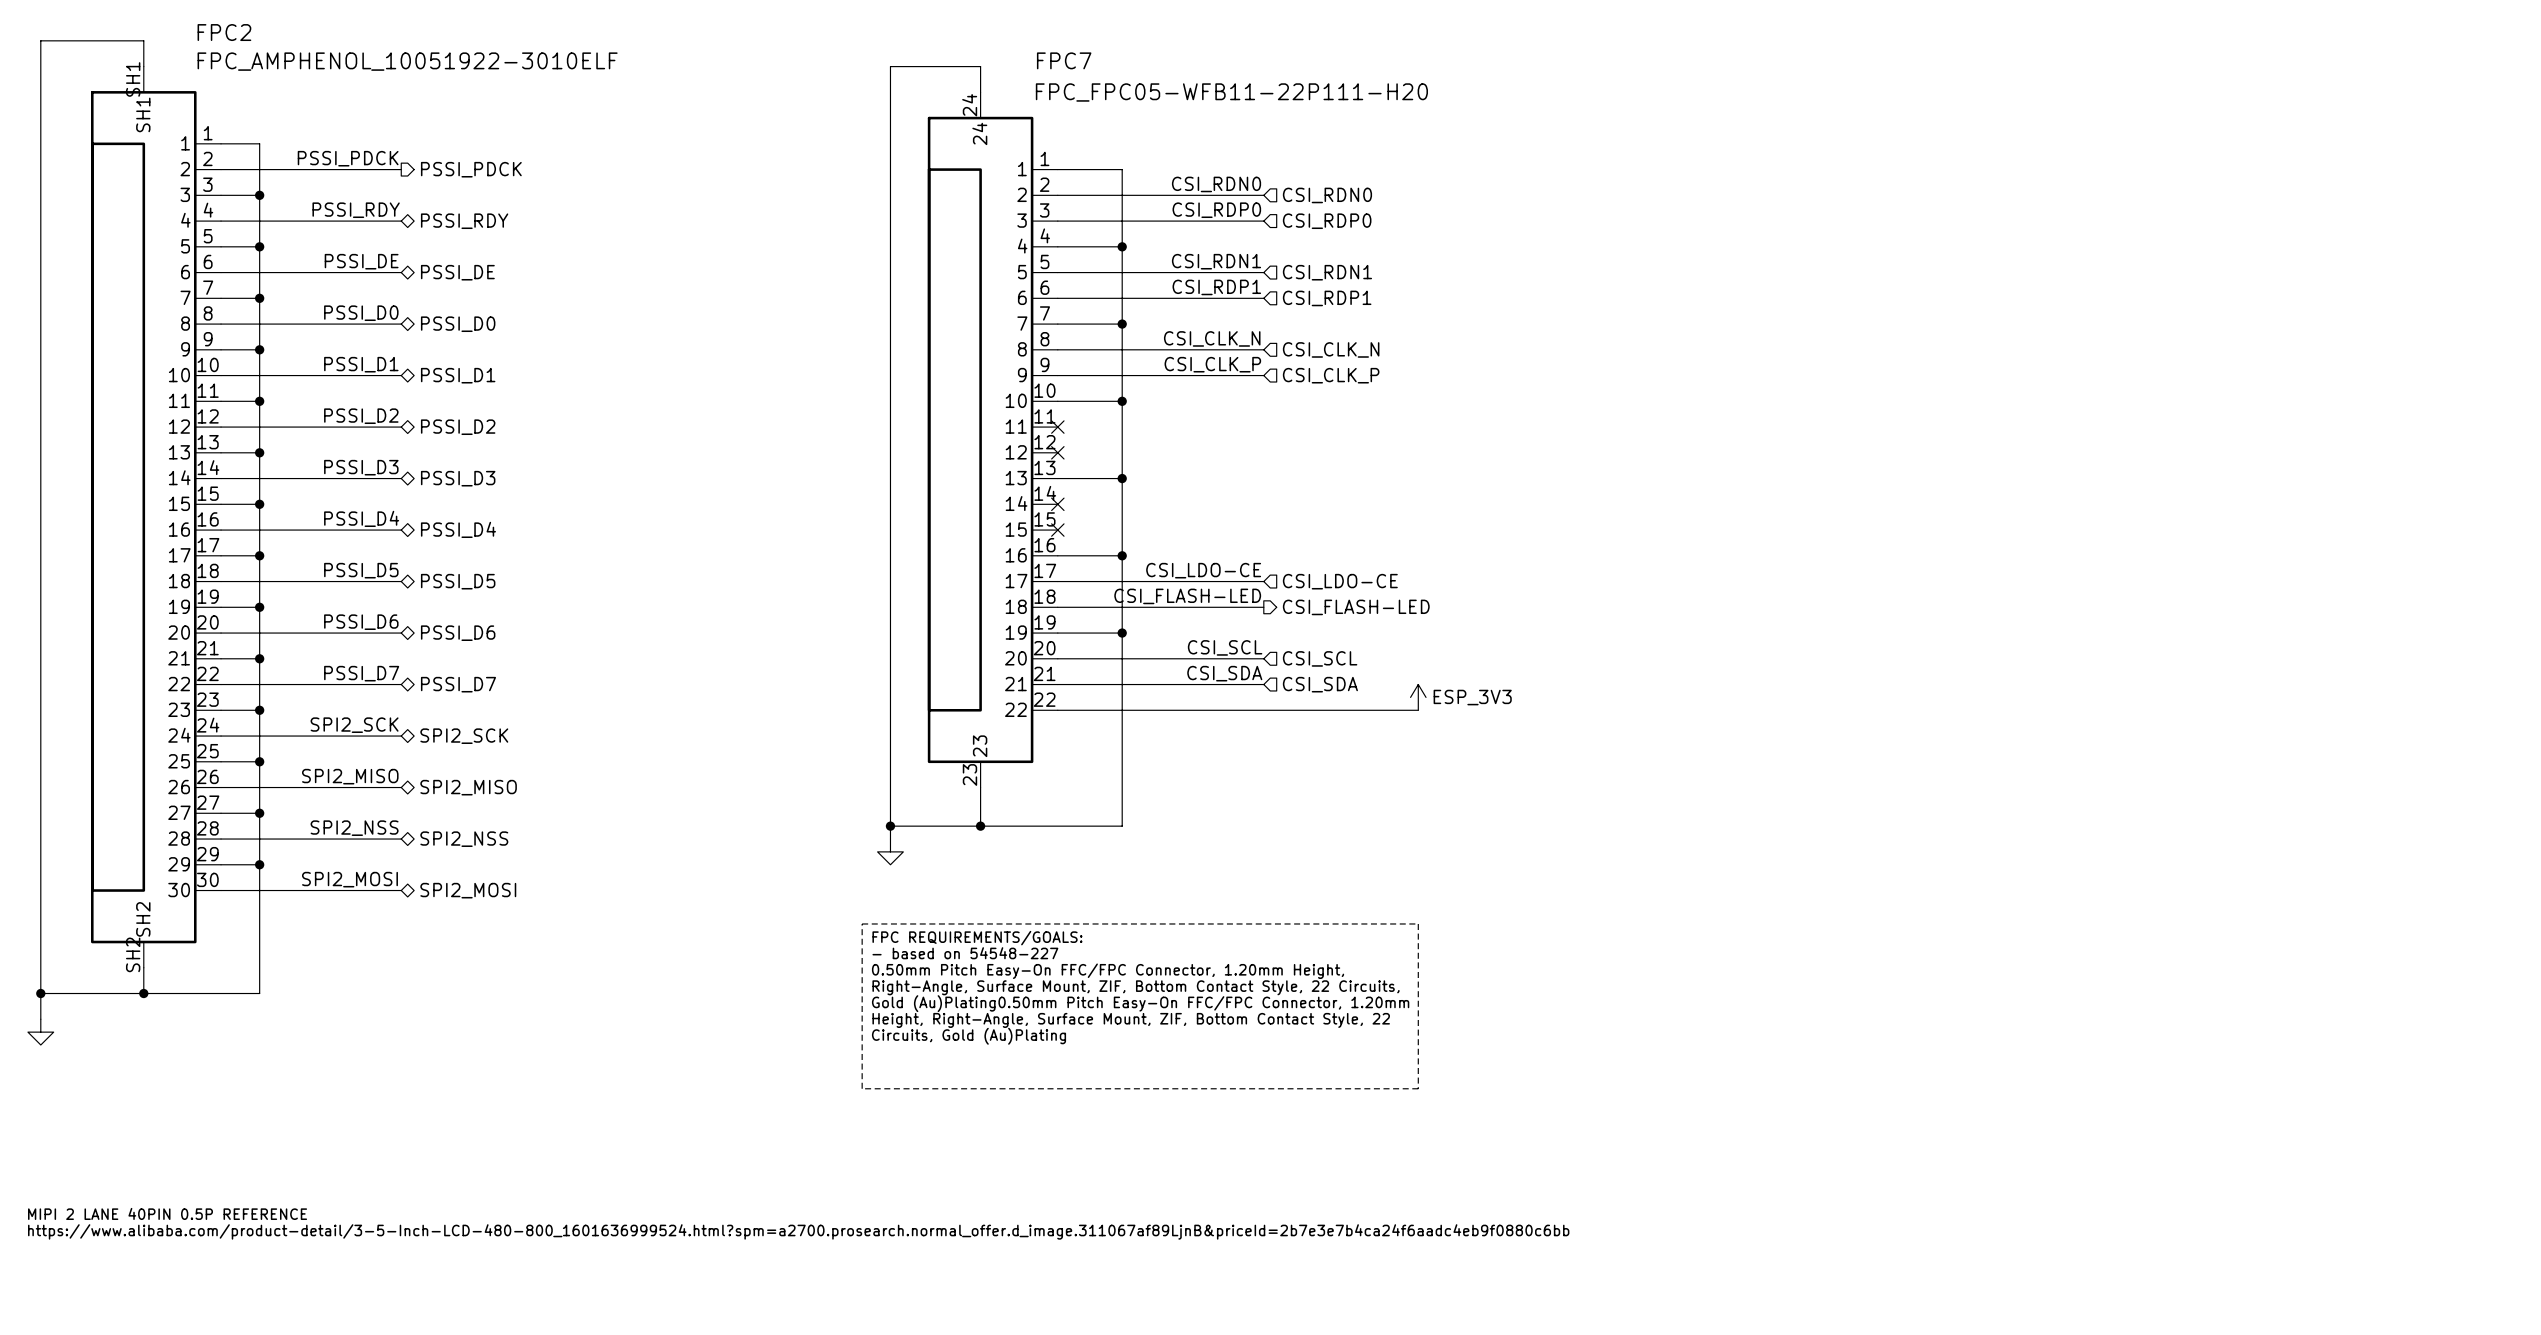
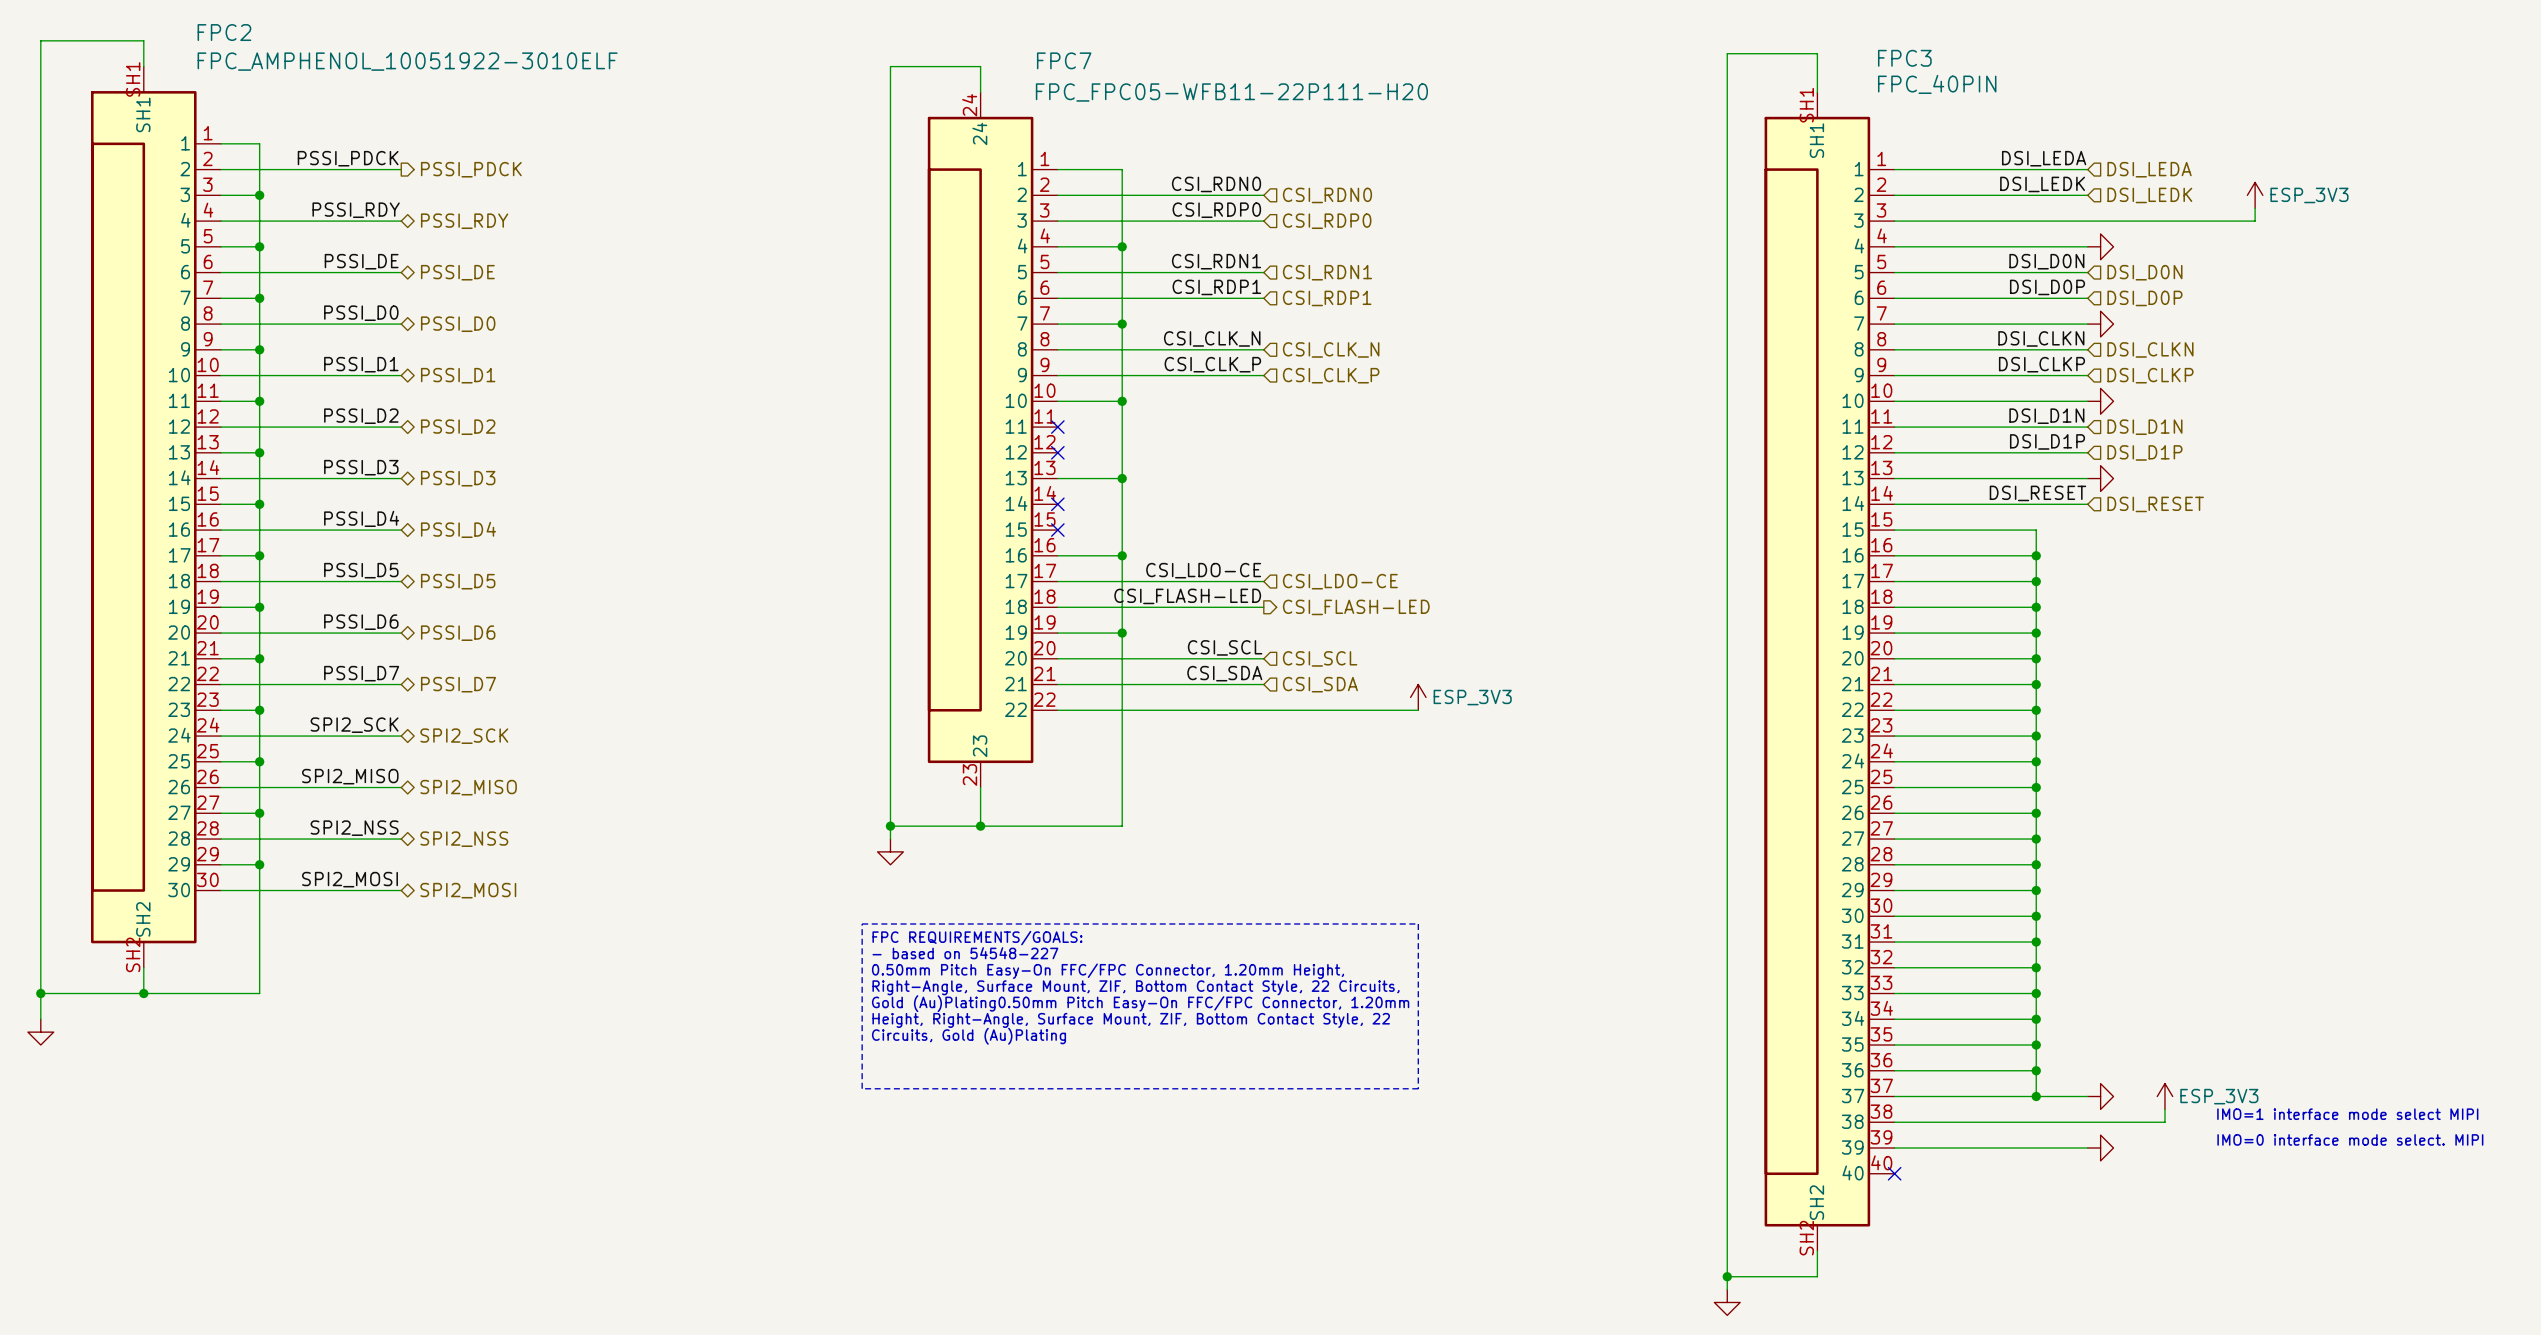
wire: none -> (1817, 92) (1817, 53) (1727, 53) (1727, 1289)
label: none -> DSI_LEDA (2044, 158)
wire: none -> (1894, 169) (2087, 169)
hierarchical label: none -> DSI_LEDA (2149, 169)
label: none -> DSI_LEDK (2042, 184)
wire: none -> (1894, 195) (2087, 195)
hierarchical label: none -> DSI_LEDK (2149, 195)
power symbol: none -> ESP_3V3 (2255, 195)
wire: none -> (2255, 208) (2255, 221) (1894, 221)
wire: none -> (1894, 246) (2087, 246)
power symbol: none -> (2100, 246)
label: none -> DSI_D0N (2046, 261)
wire: none -> (1894, 272) (2087, 272)
hierarchical label: none -> DSI_D0N (2144, 272)
label: none -> DSI_D0P (2047, 287)
wire: none -> (1894, 298) (2087, 298)
hierarchical label: none -> DSI_D0P (2144, 298)
wire: none -> (1894, 324) (2087, 324)
power symbol: none -> (2100, 324)
label: none -> DSI_CLKN (2041, 338)
wire: none -> (1894, 349) (2087, 349)
hierarchical label: none -> DSI_CLKN (2150, 349)
label: none -> DSI_CLKP (2041, 364)
wire: none -> (1894, 375) (2087, 375)
hierarchical label: none -> DSI_CLKP (2150, 375)
wire: none -> (1894, 401) (2087, 401)
power symbol: none -> (2100, 401)
label: none -> DSI_D1N (2046, 416)
wire: none -> (1894, 427) (2087, 427)
hierarchical label: none -> DSI_D1N (2144, 427)
label: none -> DSI_D1P (2047, 441)
wire: none -> (1894, 452) (2087, 452)
hierarchical label: none -> DSI_D1P (2144, 452)
wire: none -> (1894, 478) (2087, 478)
power symbol: none -> (2100, 478)
label: none -> DSI_RESET (2037, 493)
wire: none -> (1894, 504) (2087, 504)
hierarchical label: none -> DSI_RESET (2155, 504)
wire: none -> (1894, 530) (2036, 530) (2036, 1096)
wire: none -> (1894, 555) (2036, 555)
junction: none -> (2036, 555)
wire: none -> (1894, 581) (2036, 581)
junction: none -> (2036, 581)
wire: none -> (1894, 607) (2036, 607)
junction: none -> (2036, 607)
wire: none -> (1894, 633) (2036, 633)
junction: none -> (2036, 633)
wire: none -> (1894, 658) (2036, 658)
junction: none -> (2036, 658)
FPC3: none -> FPC_40PIN (1829, 671)
wire: none -> (1894, 684) (2036, 684)
junction: none -> (2036, 684)
wire: none -> (1894, 710) (2036, 710)
junction: none -> (2036, 710)
wire: none -> (1894, 736) (2036, 736)
junction: none -> (2036, 736)
wire: none -> (1894, 761) (2036, 761)
junction: none -> (2036, 761)
wire: none -> (1894, 787) (2036, 787)
junction: none -> (2036, 787)
wire: none -> (1894, 813) (2036, 813)
junction: none -> (2036, 813)
wire: none -> (1894, 839) (2036, 839)
junction: none -> (2036, 839)
wire: none -> (1894, 864) (2036, 864)
junction: none -> (2036, 864)
wire: none -> (1894, 890) (2036, 890)
junction: none -> (2036, 890)
wire: none -> (1894, 916) (2036, 916)
junction: none -> (2036, 916)
wire: none -> (1894, 942) (2036, 942)
junction: none -> (2036, 942)
wire: none -> (1894, 967) (2036, 967)
junction: none -> (2036, 967)
wire: none -> (1894, 993) (2036, 993)
junction: none -> (2036, 993)
wire: none -> (1894, 1019) (2036, 1019)
junction: none -> (2036, 1019)
wire: none -> (1894, 1045) (2036, 1045)
junction: none -> (2036, 1045)
wire: none -> (1894, 1070) (2036, 1070)
junction: none -> (2036, 1070)
wire: none -> (1894, 1096) (2087, 1096)
junction: none -> (2036, 1096)
power symbol: none -> (2100, 1096)
power symbol: none -> ESP_3V3 (2164, 1096)
wire: none -> (2164, 1109) (2164, 1122) (1894, 1122)
text: none -> IMO=1 interface mode select MIPI (2347, 1114)
text: none -> IMO=0 interface mode select. MIPI (2350, 1139)
wire: none -> (1894, 1147) (2087, 1147)
power symbol: none -> (2100, 1147)
no-connect mark: none -> (1894, 1173)
text: MIPI 2 LANE 40PIN 0.5P REFERENCE (167, 1213) -> none
text: https://www.alibaba.com/product-detail/3-5-Inch-LCD-480-800_1601636999524.html?spm=a2700.prosearch.normal_offer.d_image.311067af89LjnB&priceId=2b7e3e7b4ca24f6aadc4eb9f0880c6bb (798, 1231) -> none
wire: none -> (1817, 1250) (1817, 1276) (1727, 1276)
junction: none -> (1727, 1276)
power symbol: none -> (1727, 1302)

